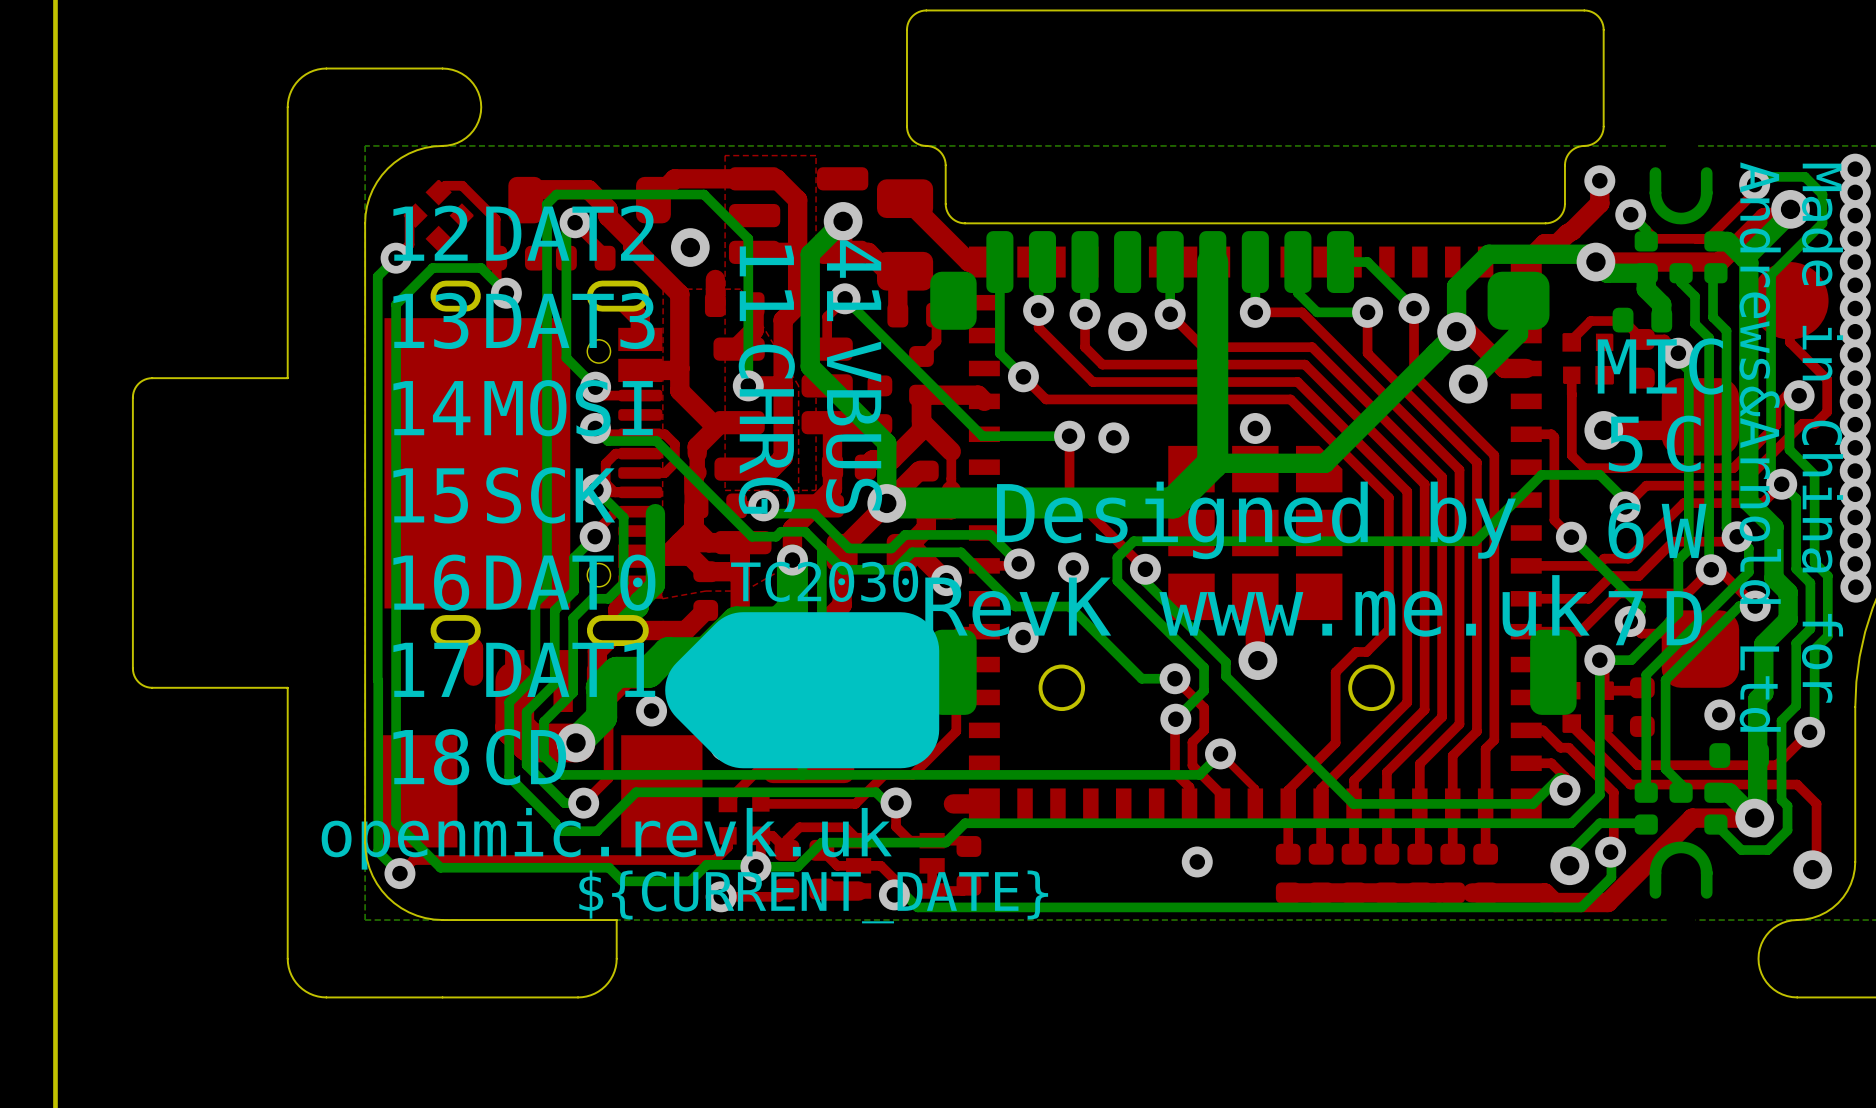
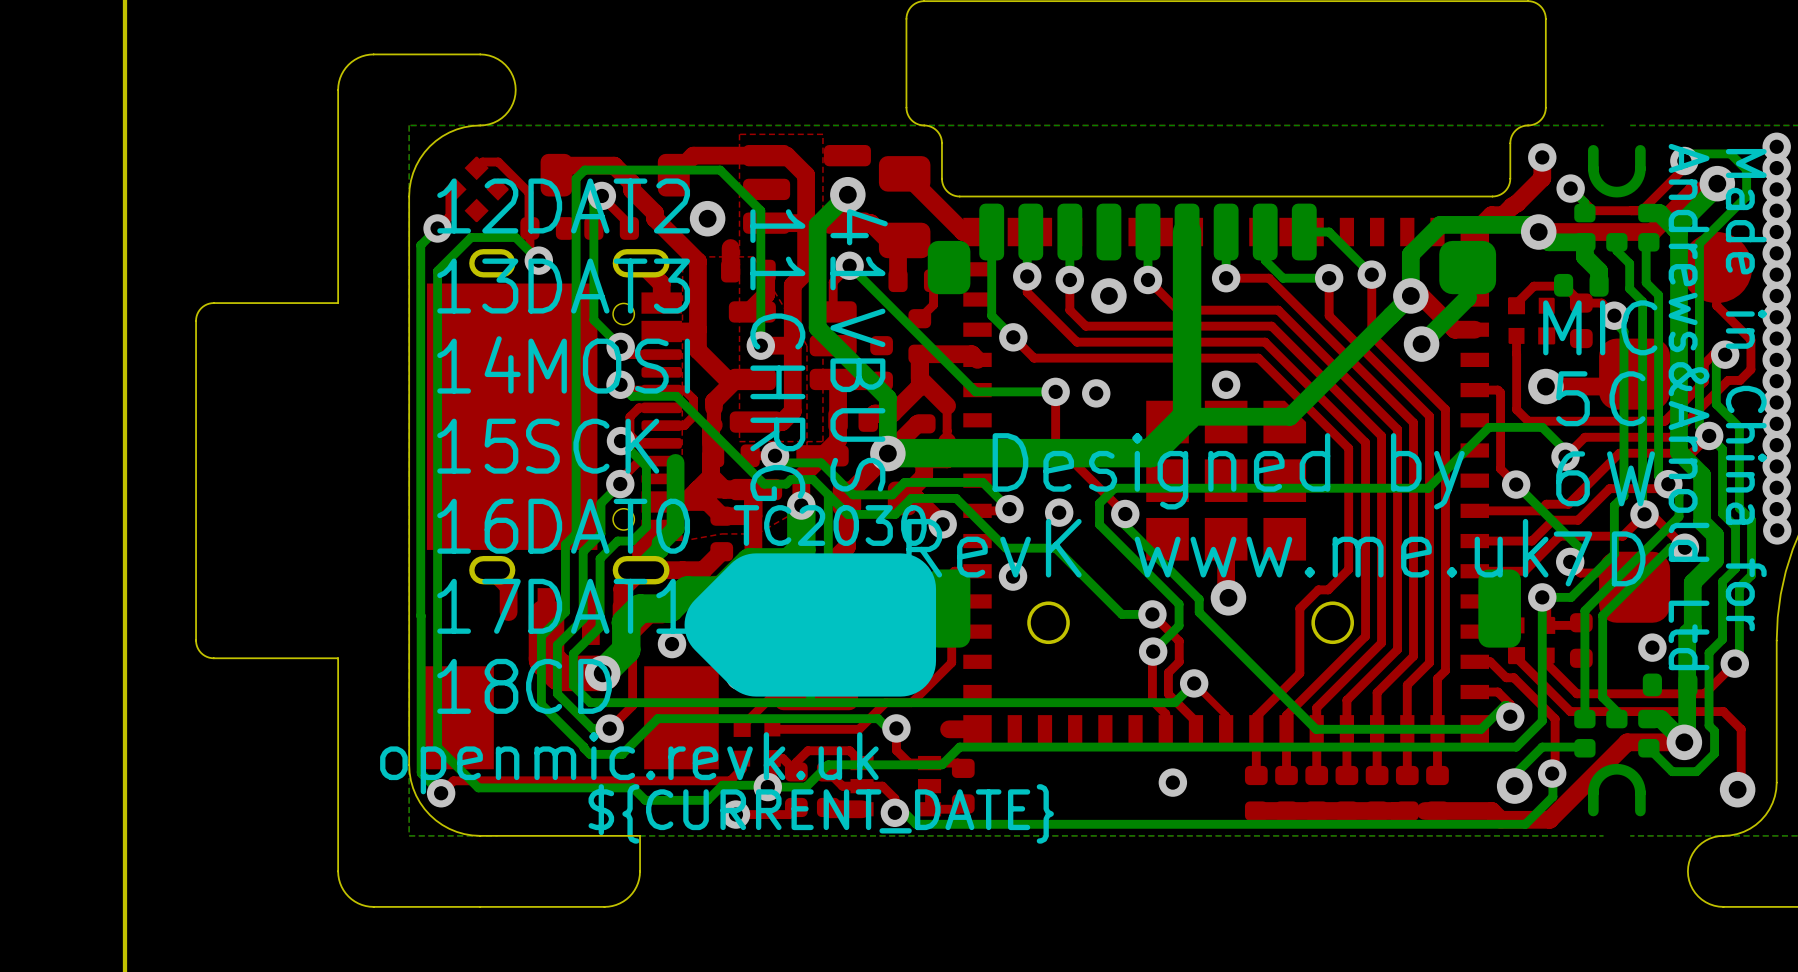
board edge: (287, 339) (287, 378) (149, 378) (138, 383) (132, 397) -> (338, 303) (207, 304) (201, 308) (196, 316) (196, 356)
board edge: (132, 668) (136, 680) (149, 687) (287, 687) (287, 726) -> (196, 604) (196, 645) (199, 651) (207, 656) (338, 658)

